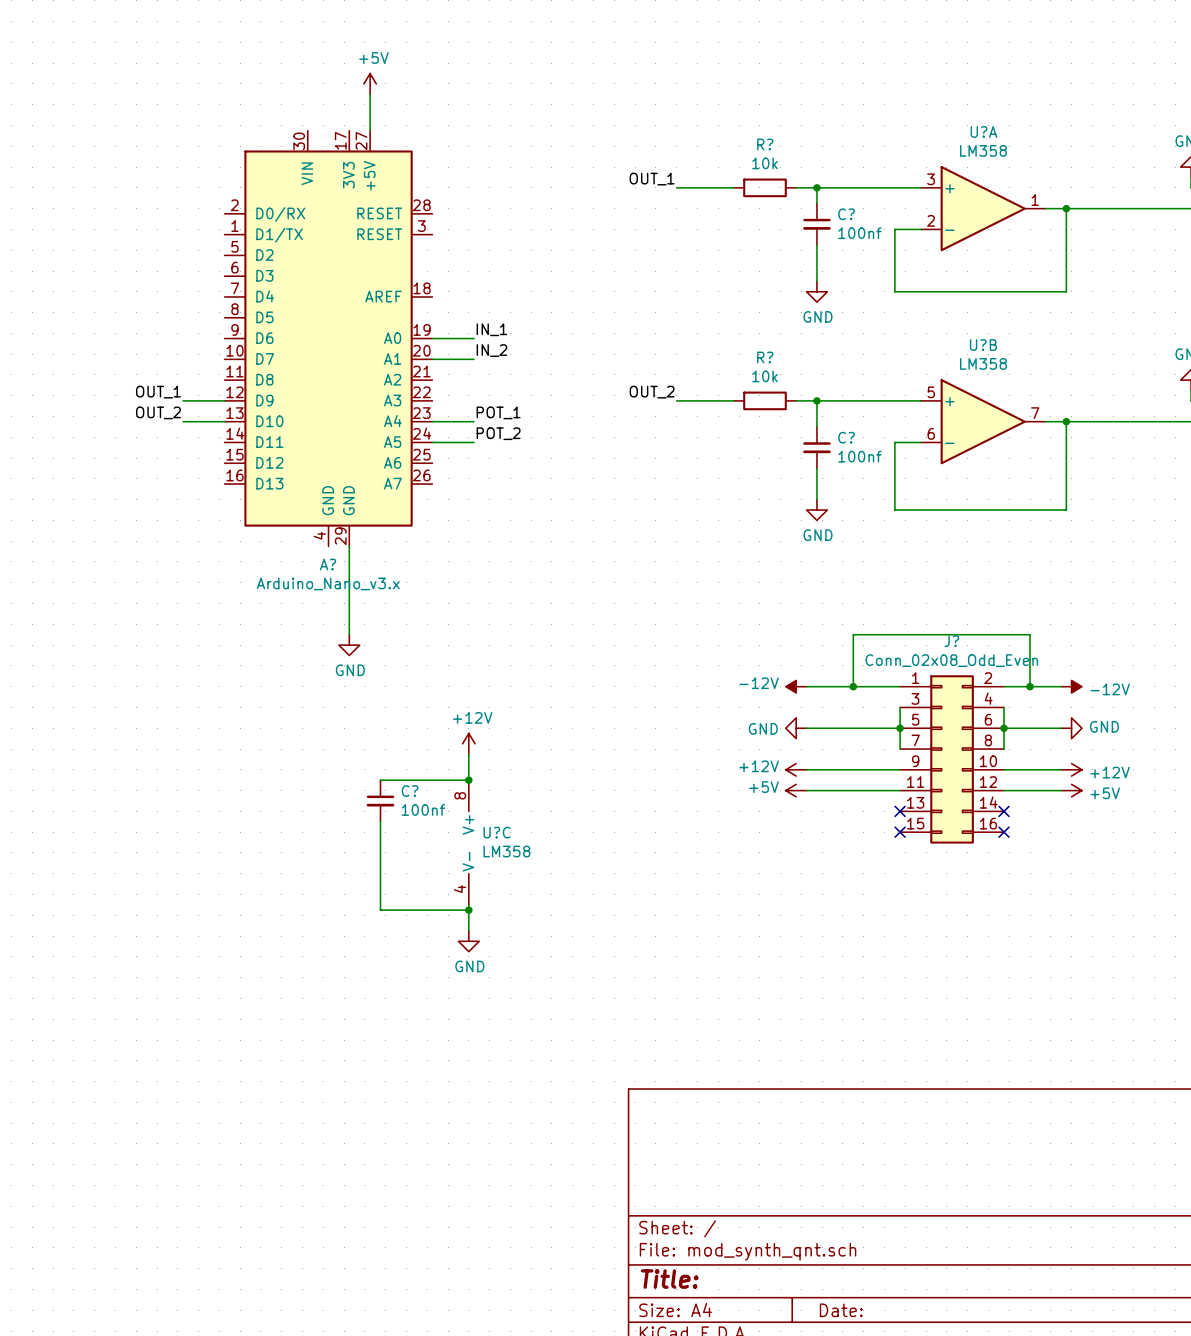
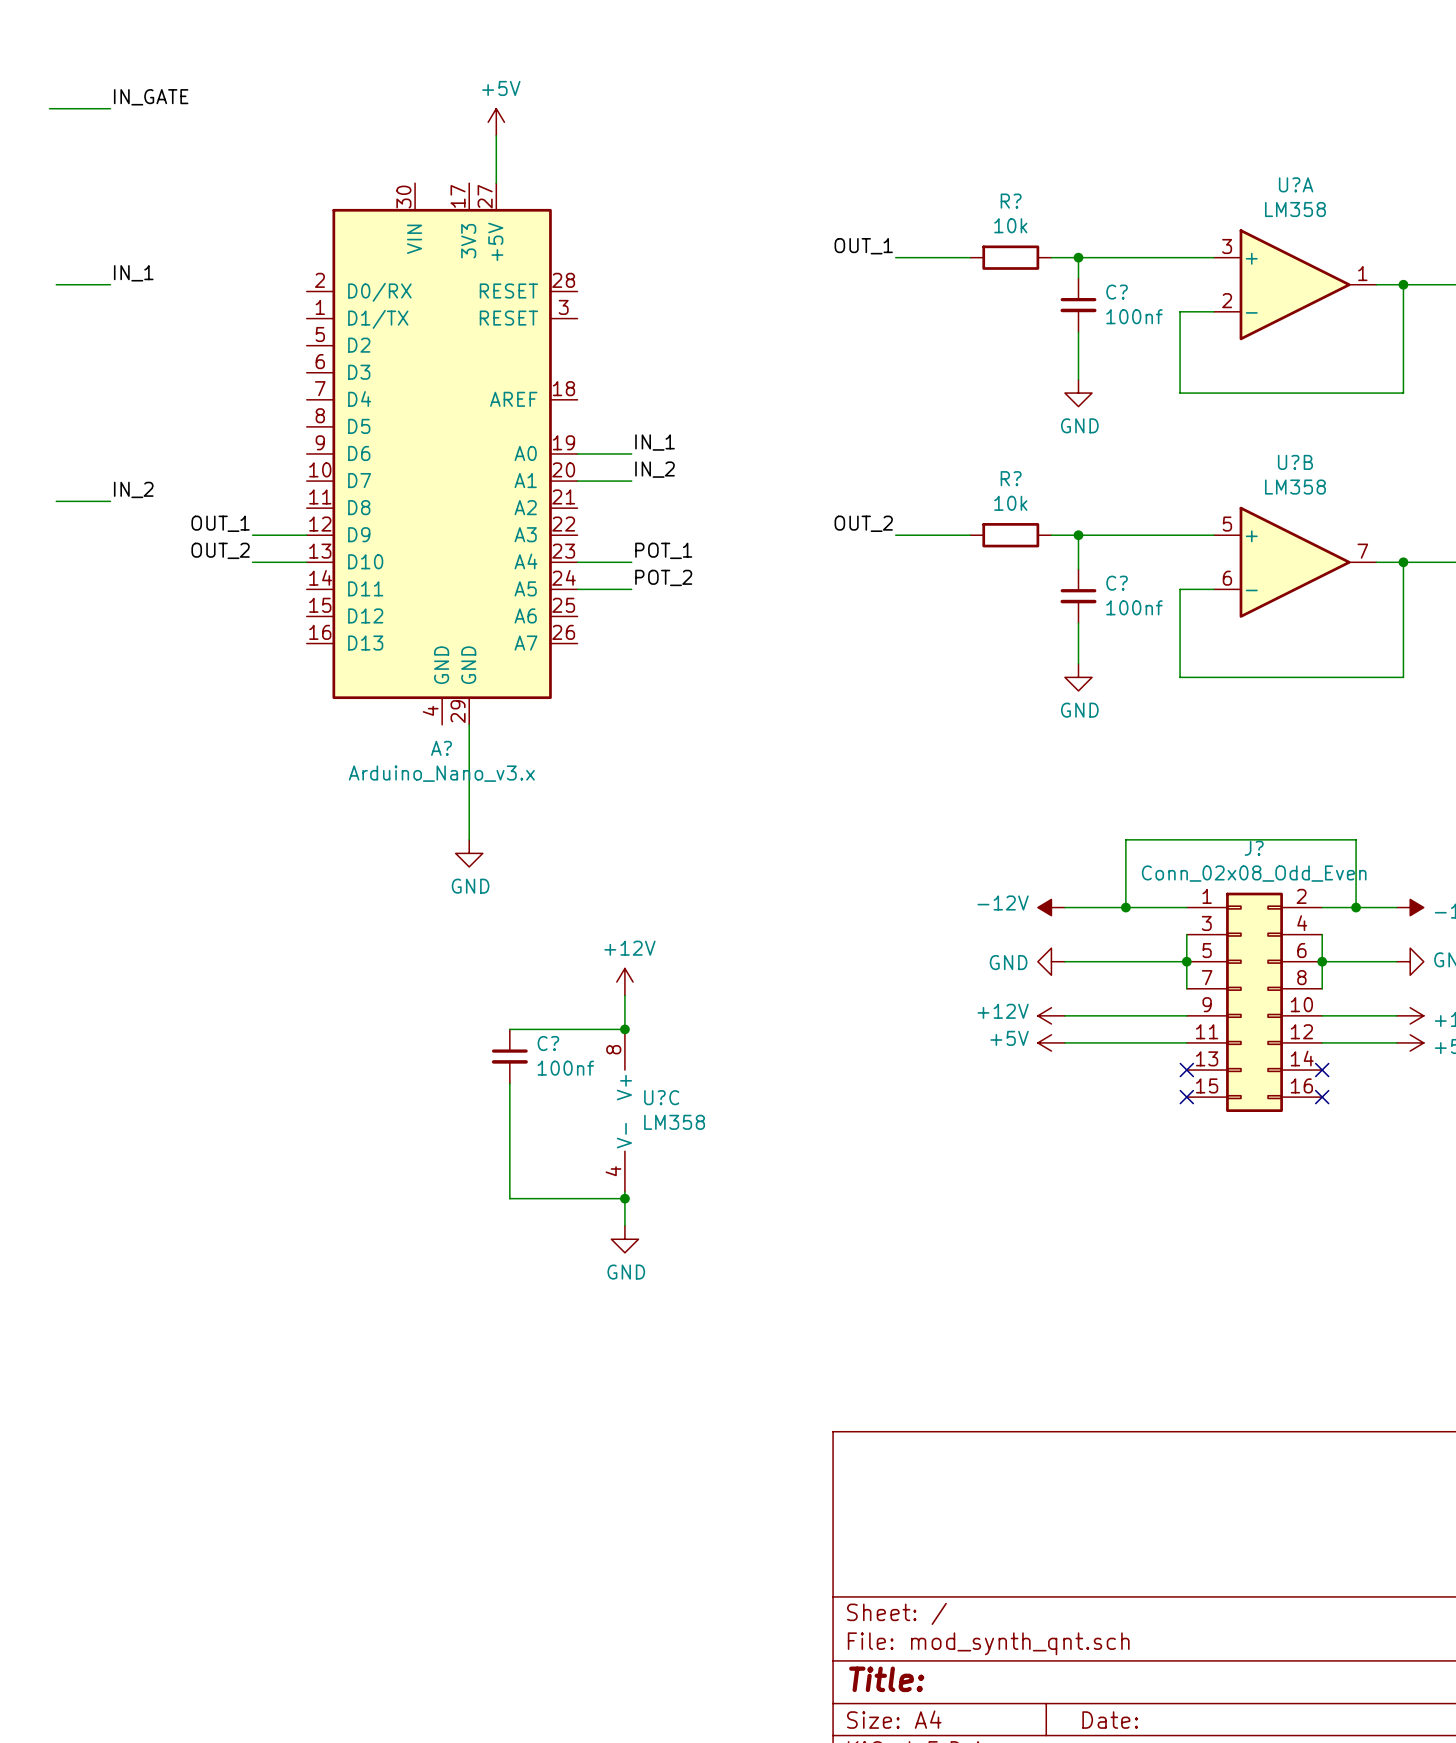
label: none -> IN_GATE (151, 97)
wire: none -> (49, 108) (110, 108)
label: none -> IN_1 (133, 273)
wire: none -> (56, 284) (110, 284)
label: none -> IN_2 (133, 489)
wire: none -> (56, 501) (110, 501)

